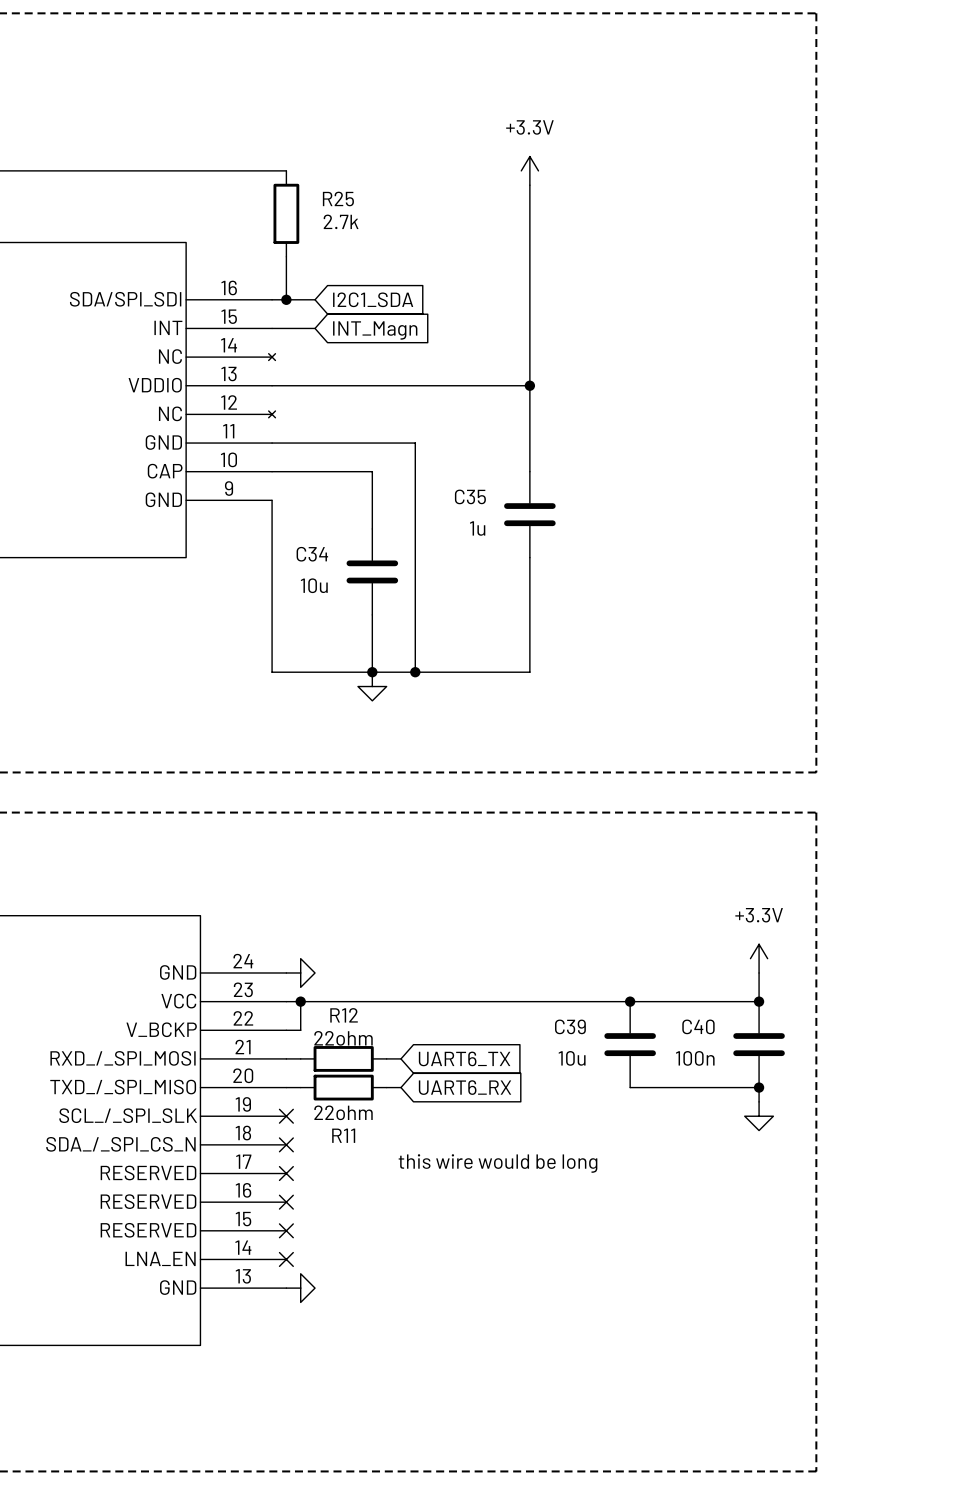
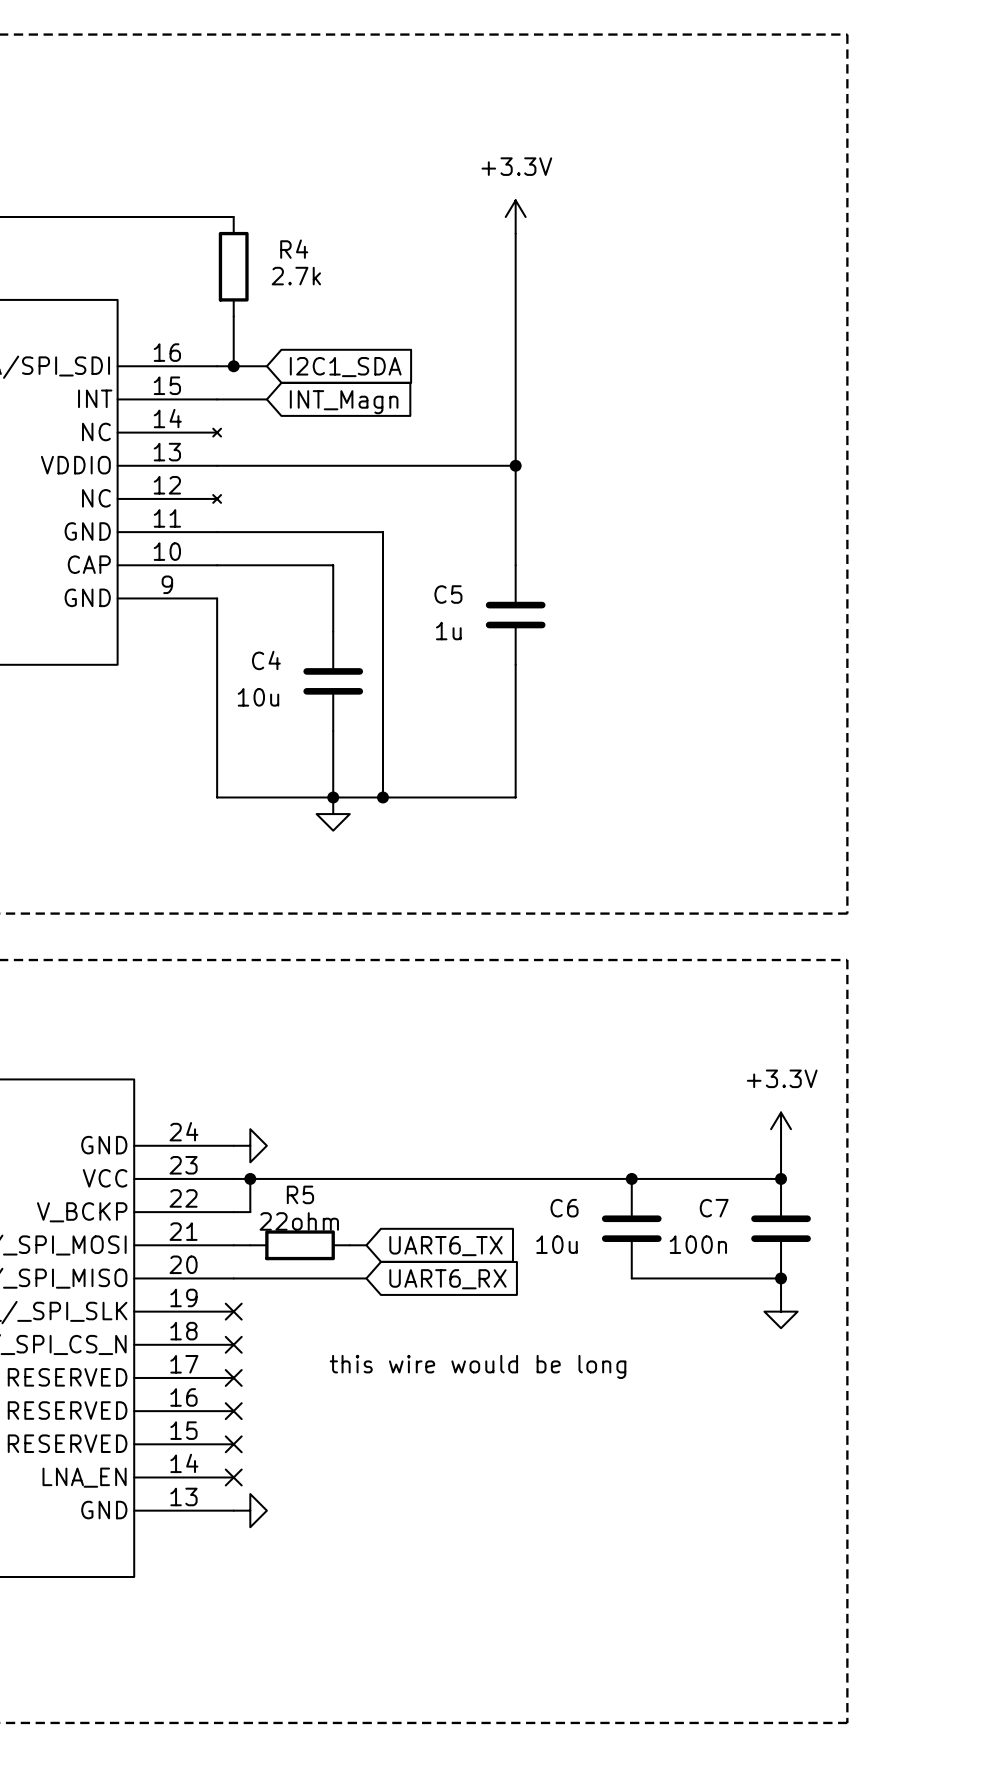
R25 name: R25 (338, 198) -> R4 (294, 249)
C35 name: C35 (470, 496) -> C5 (448, 594)
C34 name: C34 (312, 554) -> C4 (266, 660)
R12 name: R12 (344, 1015) -> R5 (300, 1194)
C39 name: C39 (570, 1026) -> C6 (564, 1208)
C40 name: C40 (698, 1026) -> C7 (714, 1208)
wire: none -> (250, 1278) (349, 1278)
R11: 22ohm (343, 1087) -> none

